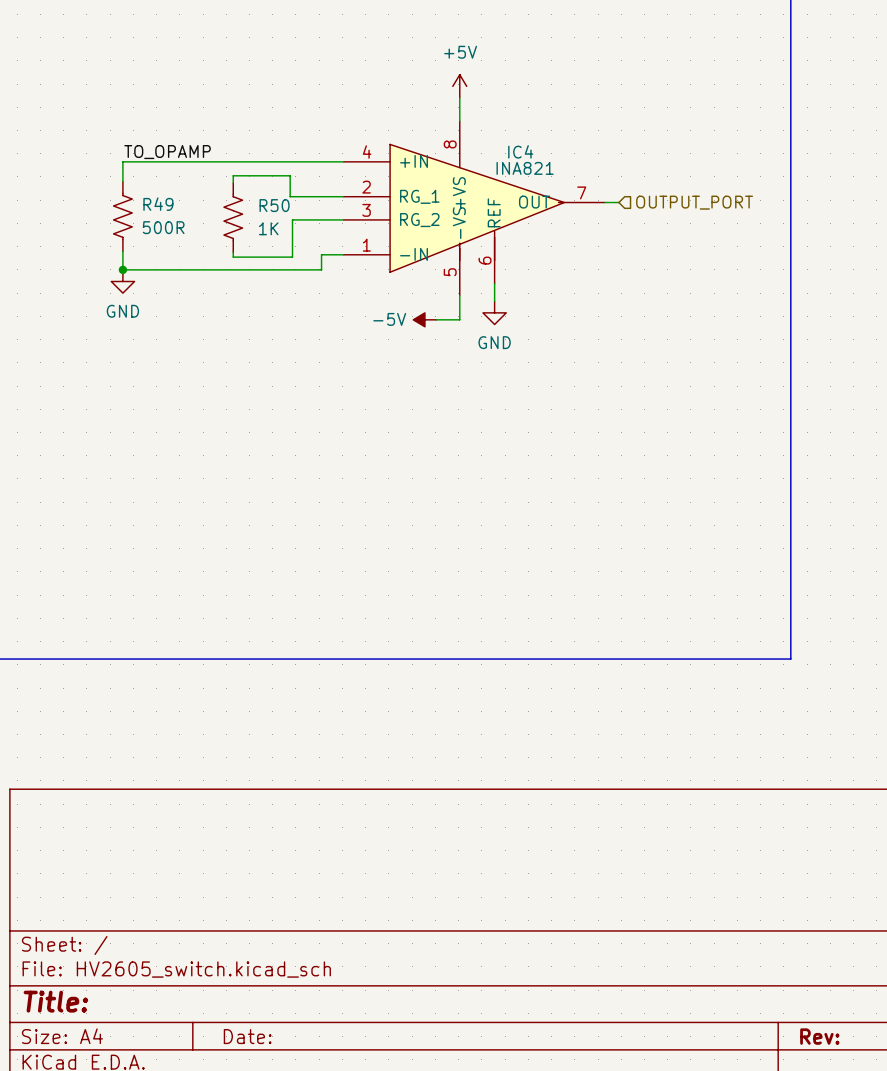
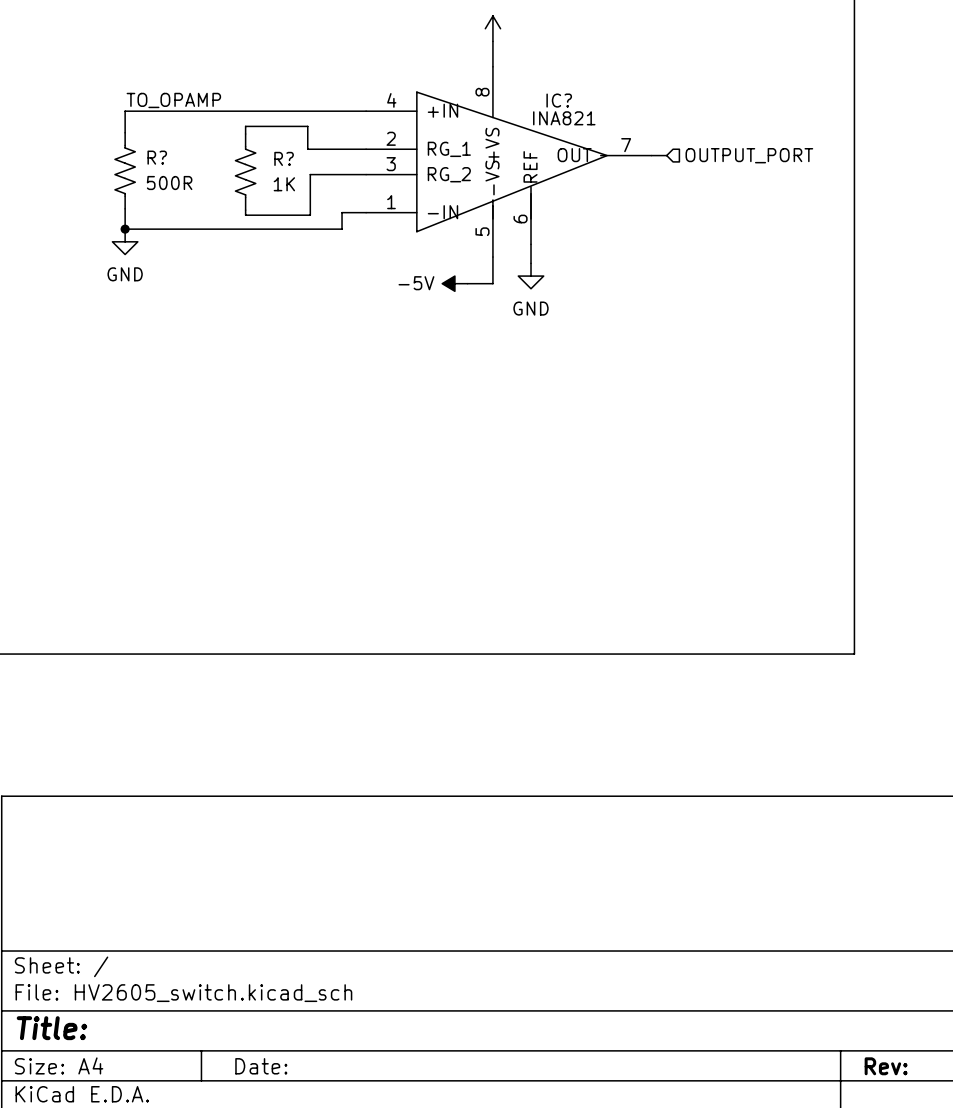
IC4 name: IC4 (520, 151) -> IC? (559, 100)
R49 name: R49 (158, 204) -> R? (157, 157)
R50 name: R50 (274, 205) -> R? (284, 158)

